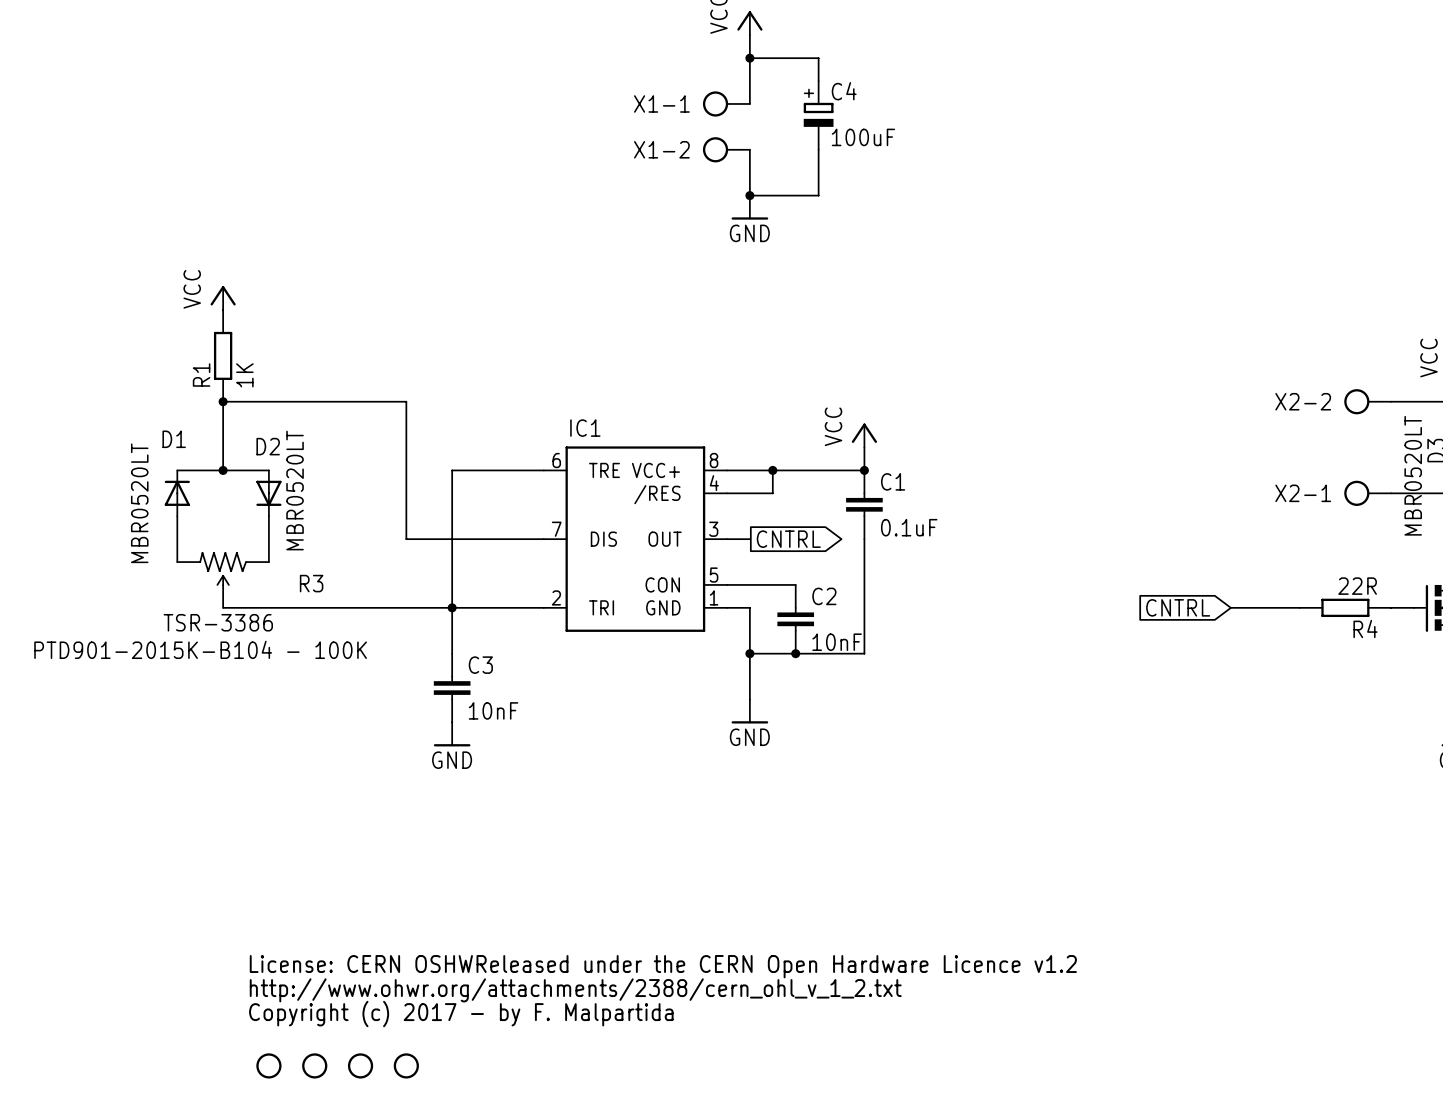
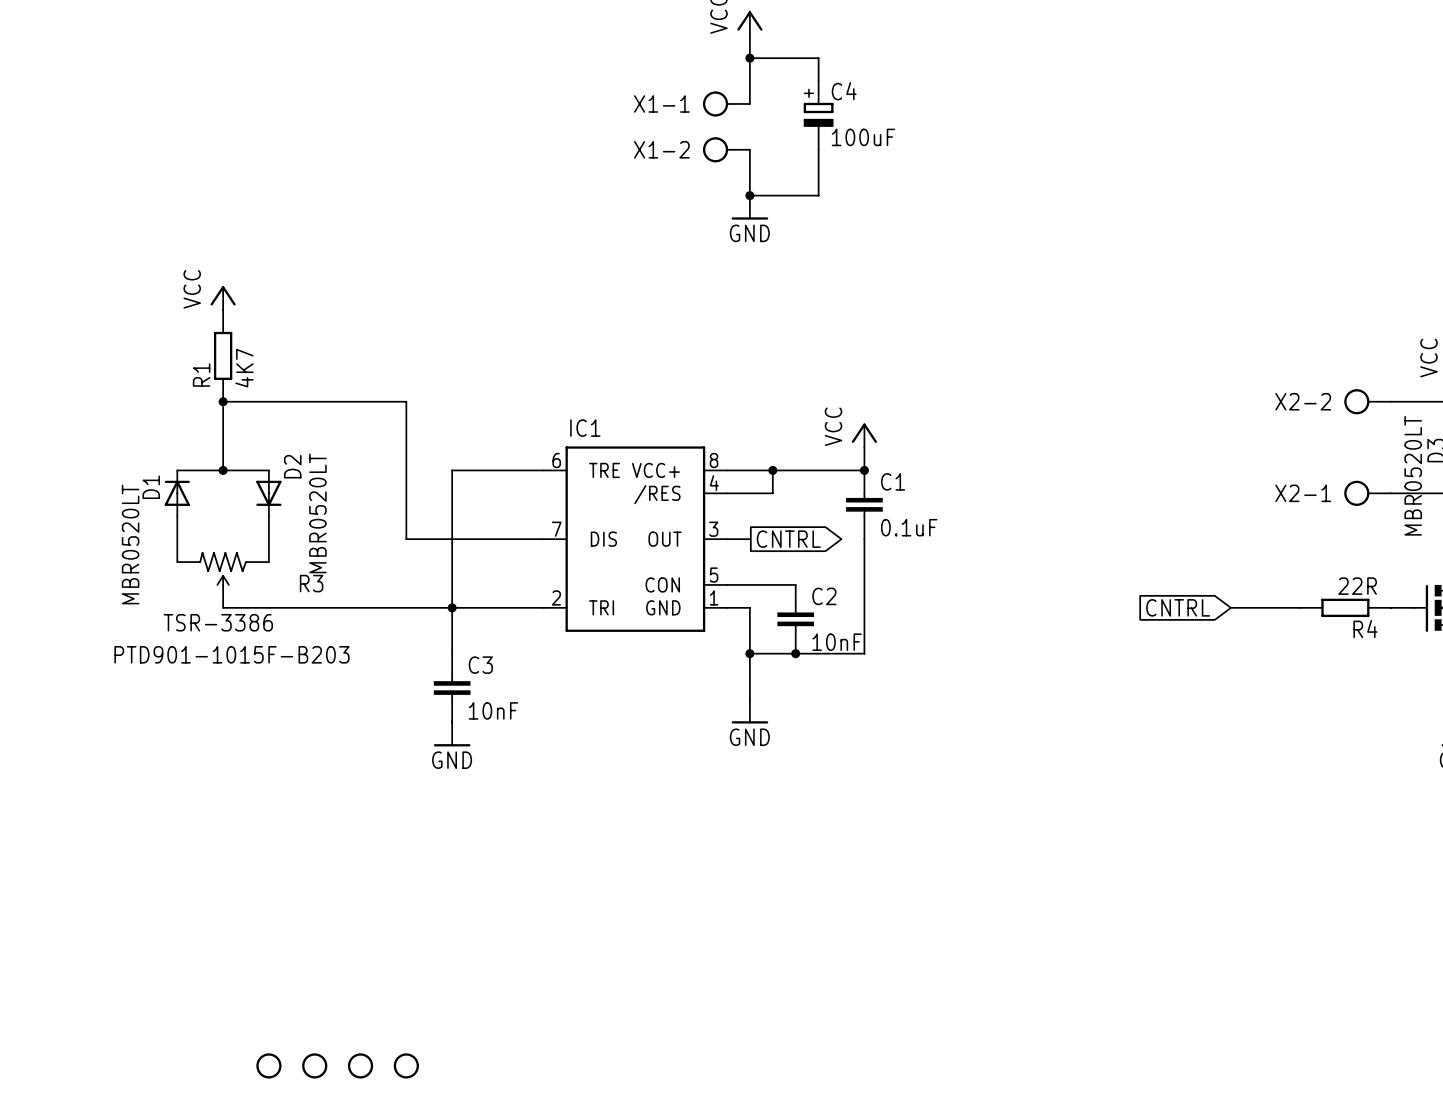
R1 value: 1K (244, 375) -> 4K7 (244, 368)
D1 name rotation: 0° (174, 439) -> 90° counterclockwise (151, 487)
D1 name position: D1 (174, 439) -> D1 (151, 487)
D2 name rotation: 0° (268, 446) -> 90° counterclockwise (292, 466)
D2 value position: MBR0520LT (295, 490) -> MBR0520LT (317, 513)
D1 value position: MBR0520LT (139, 503) -> MBR0520LT (130, 544)
text: PTD901-2015K-B104 - 100K (200, 649) -> PTD901-1015F-B203 (231, 654)
text: License: CERN OSHWReleased under the CERN Open Hardware Licence v1.2 (663, 966) -> none
text: http://www.ohwr.org/attachments/2388/cern_ohl_v_1_2.txt (575, 990) -> none
text: Copyright (c) 2017 - by F. Malpartida (461, 1014) -> none

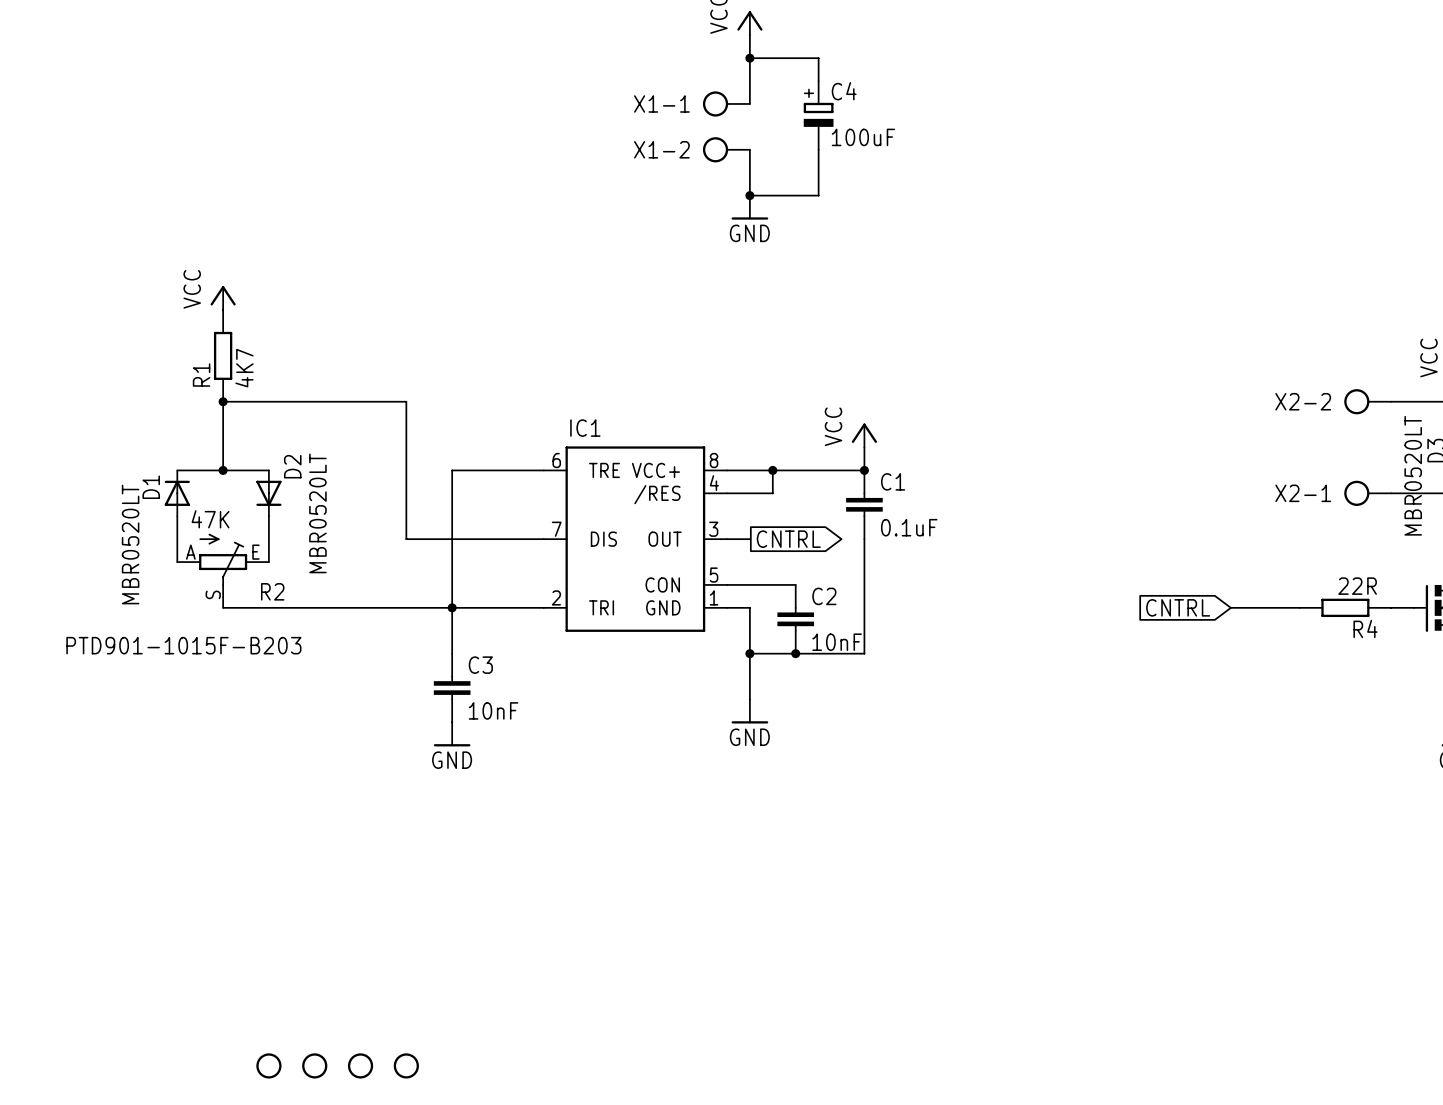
R2: none -> 47K (223, 570)
R3: TSR-3386 (223, 580) -> none
text position: PTD901-1015F-B203 (231, 654) -> PTD901-1015F-B203 (183, 645)

